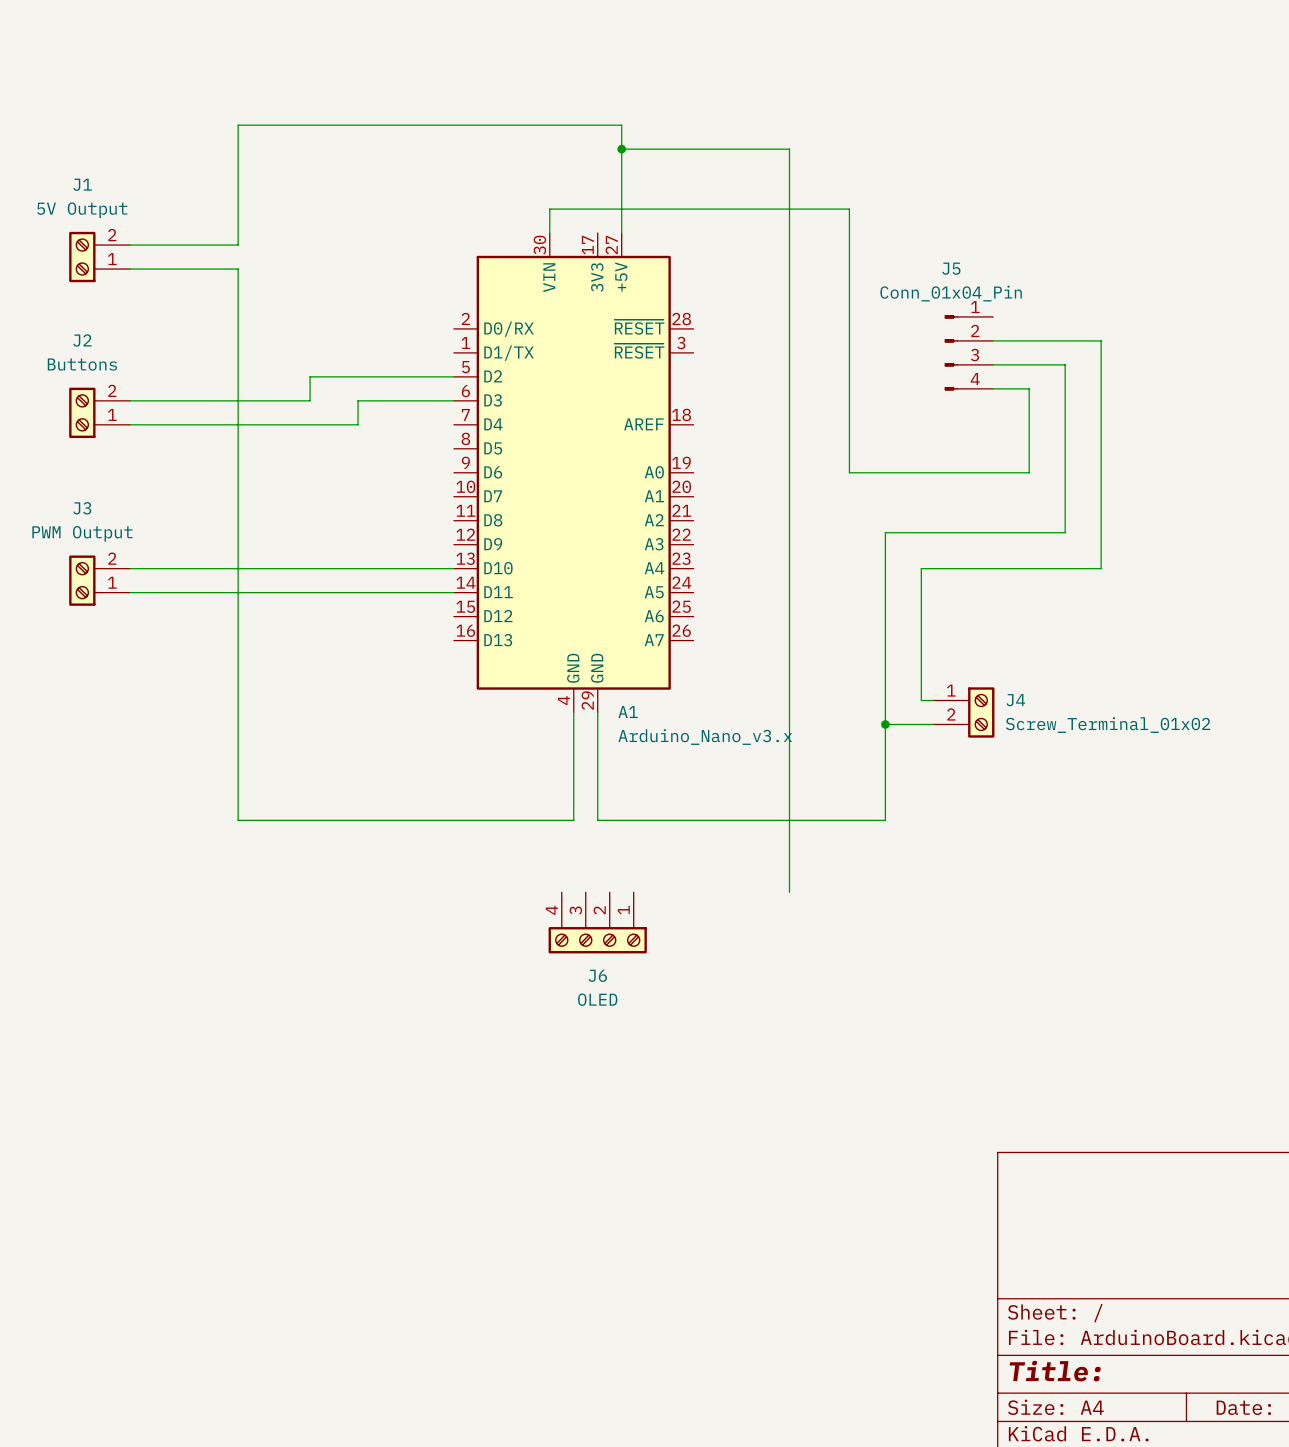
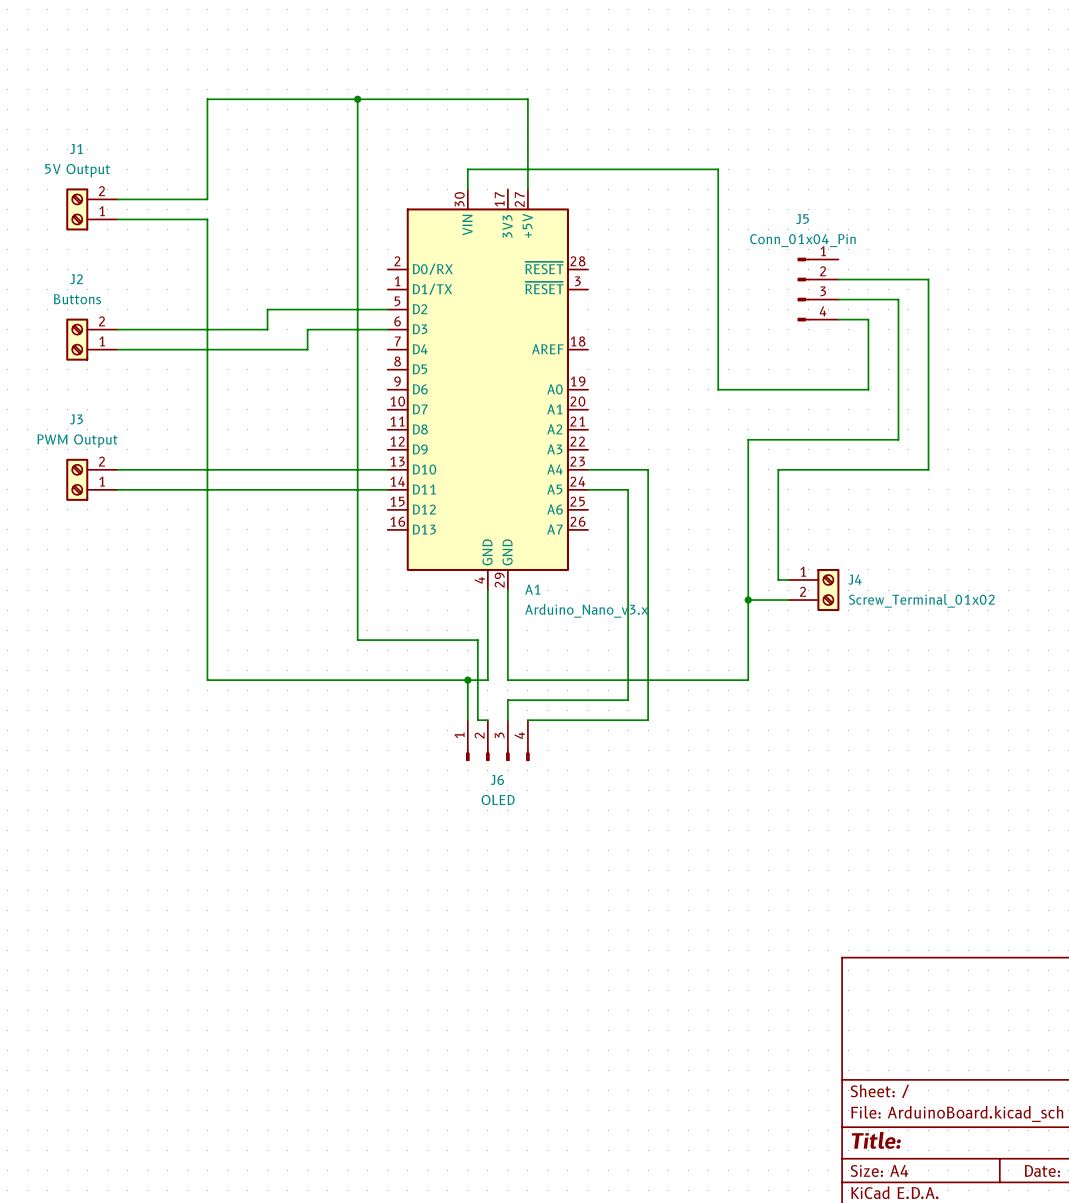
wire: none -> (357, 99) (357, 640) (477, 640) (477, 720) (487, 720)
junction: none -> (357, 99)
wire: (621, 149) (789, 149) (789, 892) -> none
junction: (621, 149) -> none
wire: none -> (588, 469) (648, 469) (648, 720) (527, 720)
wire: none -> (588, 489) (628, 489) (628, 700) (507, 700) (507, 720)
wire: none -> (467, 680) (467, 720)
junction: none -> (467, 680)
J6 symbol: [548, 892, 647, 954] -> [466, 720, 530, 761]

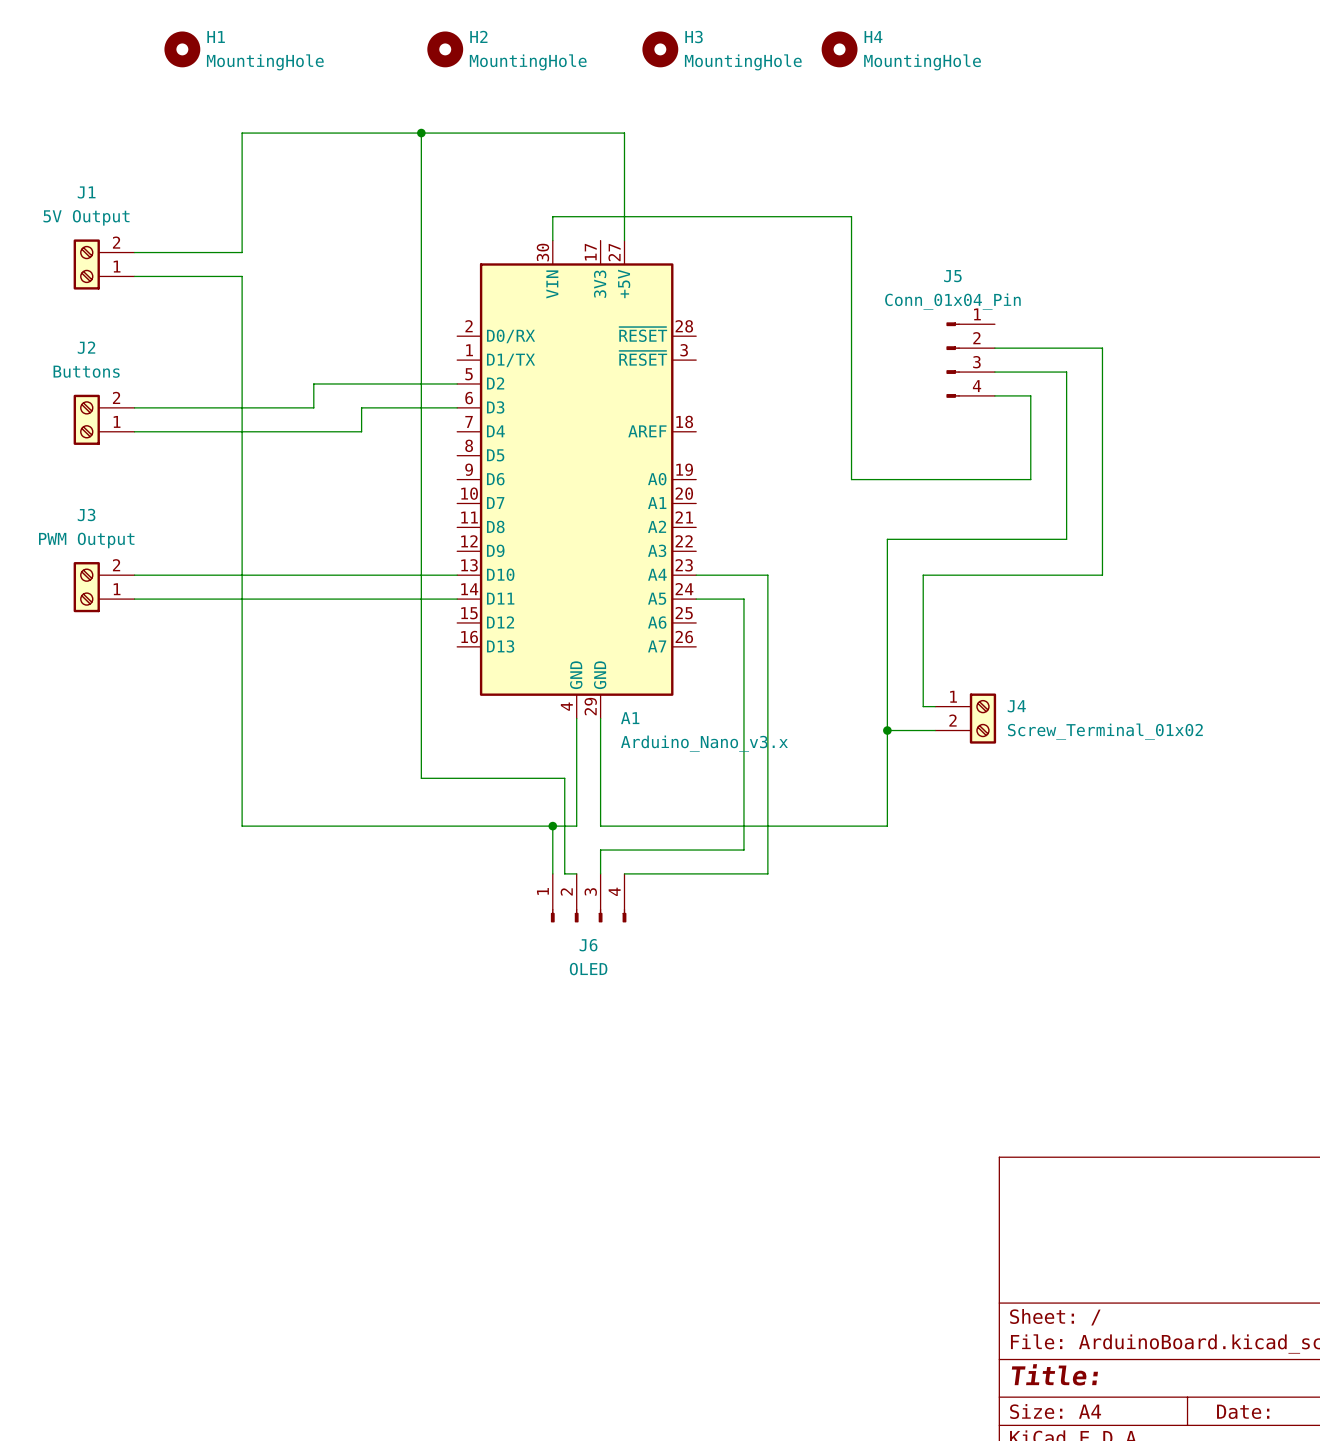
H1: none -> MountingHole (182, 49)
H2: none -> MountingHole (445, 49)
H3: none -> MountingHole (660, 49)
H4: none -> MountingHole (839, 49)

